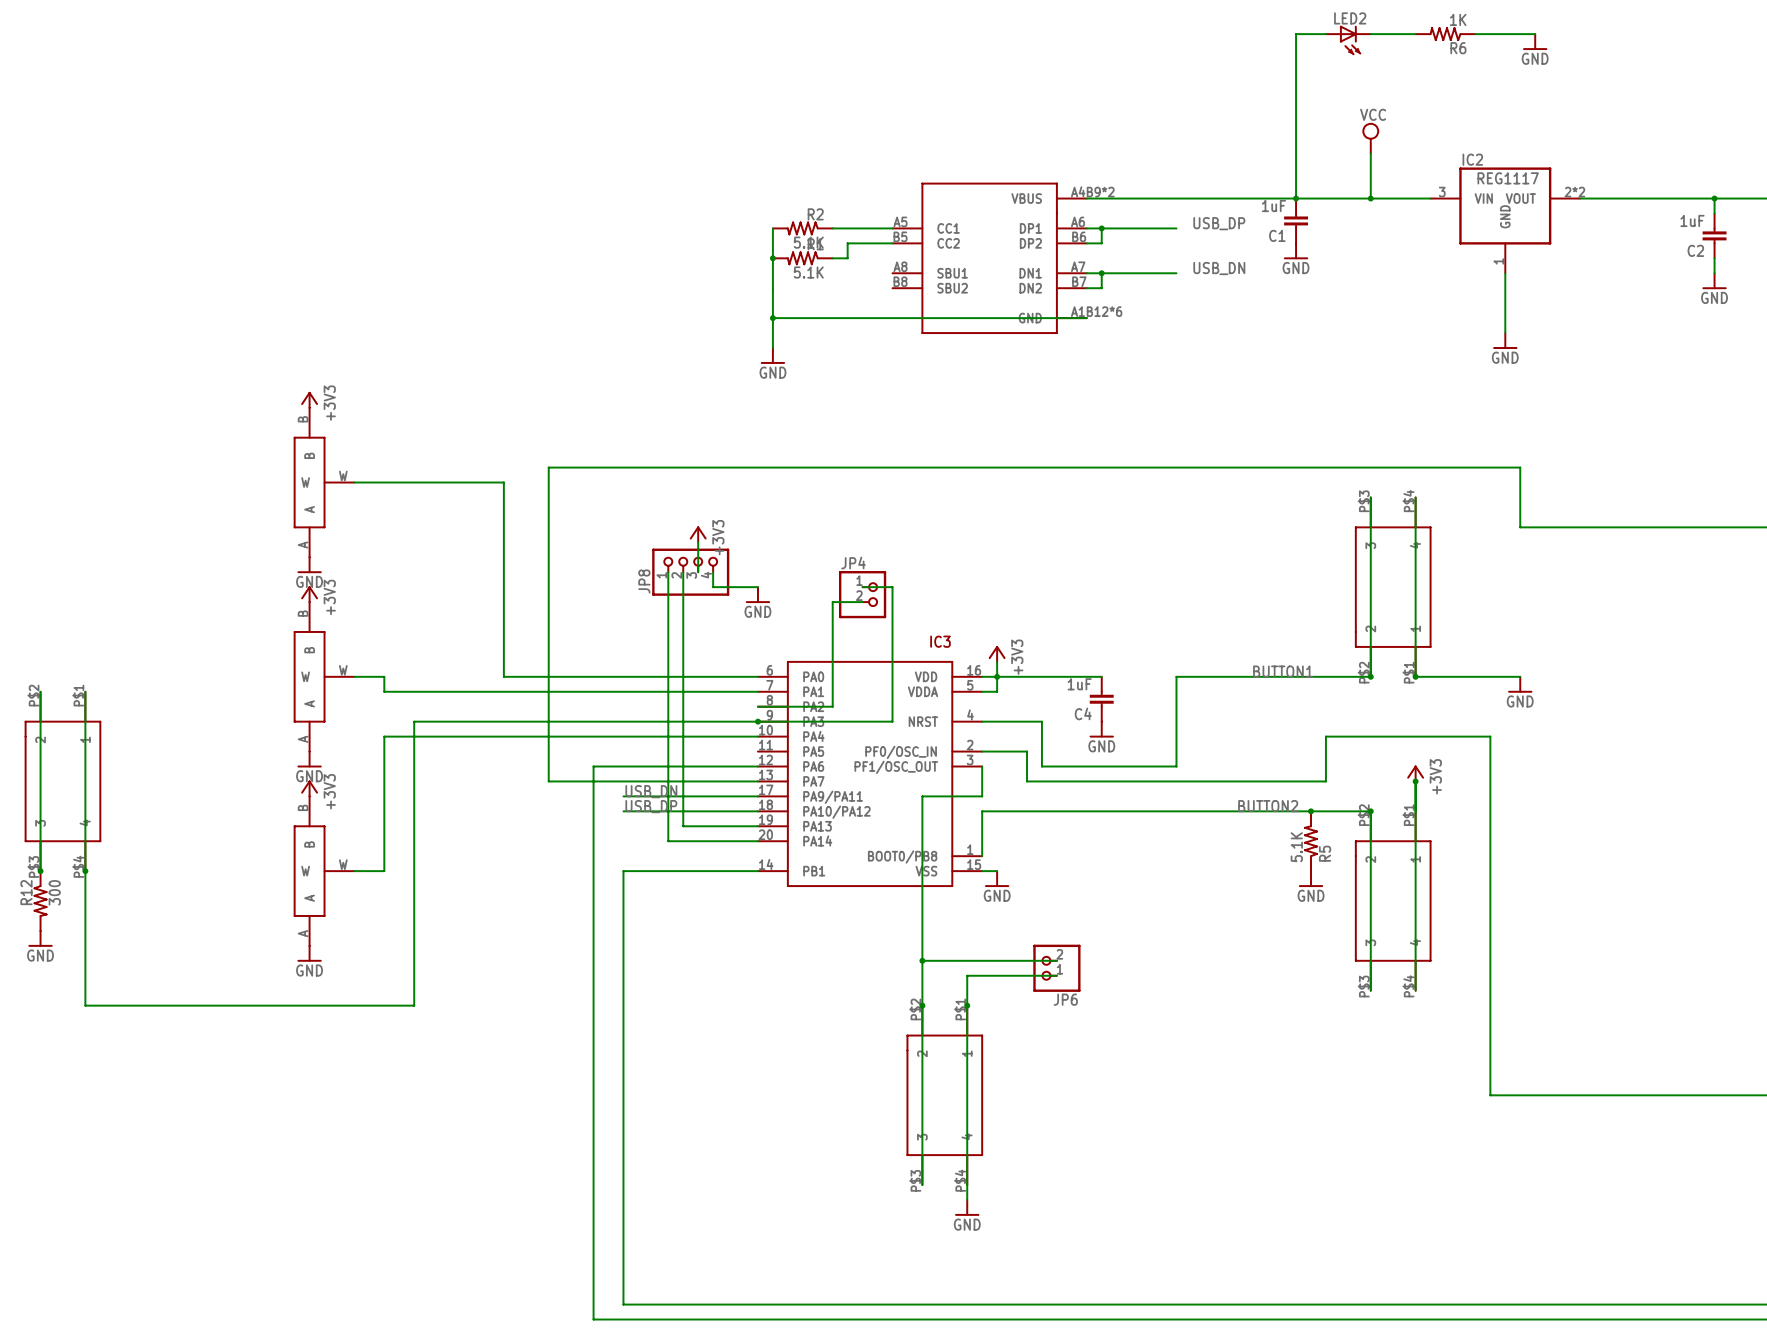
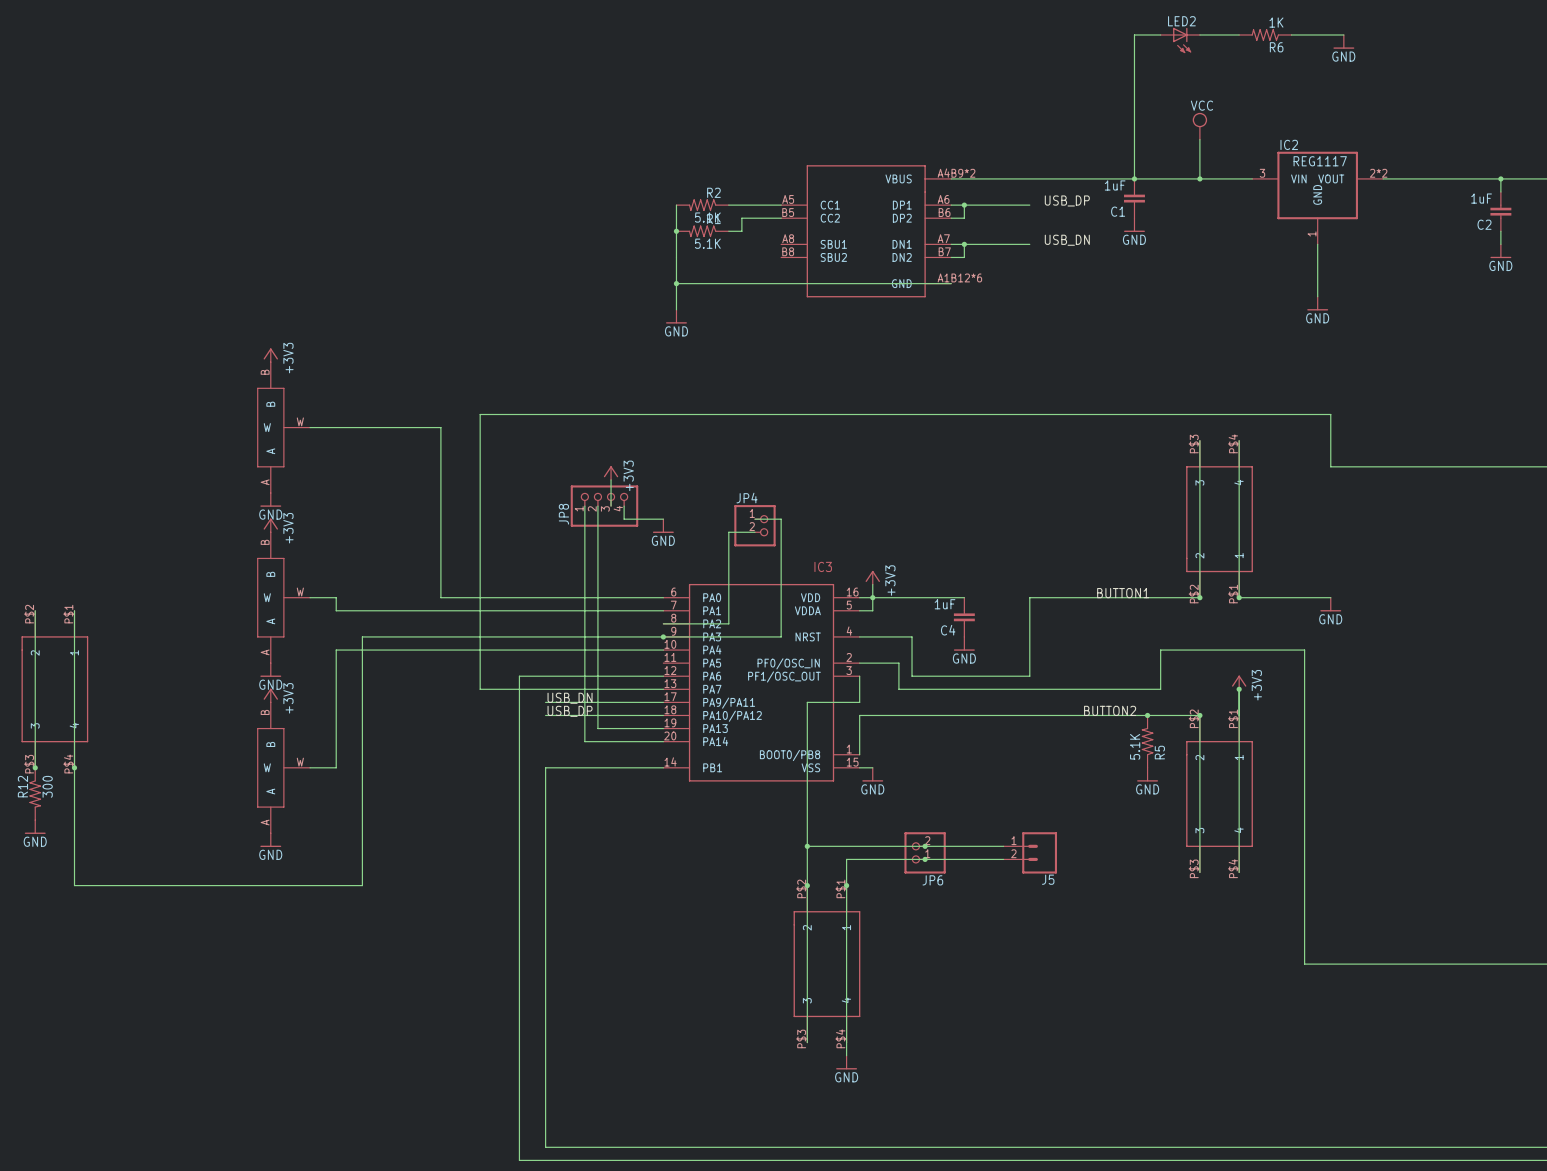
wire: none -> (925, 846) (1003, 846)
junction: none -> (925, 846)
J5: none -> (1030, 852)
wire: none -> (925, 859) (1003, 859)
junction: none -> (925, 859)

